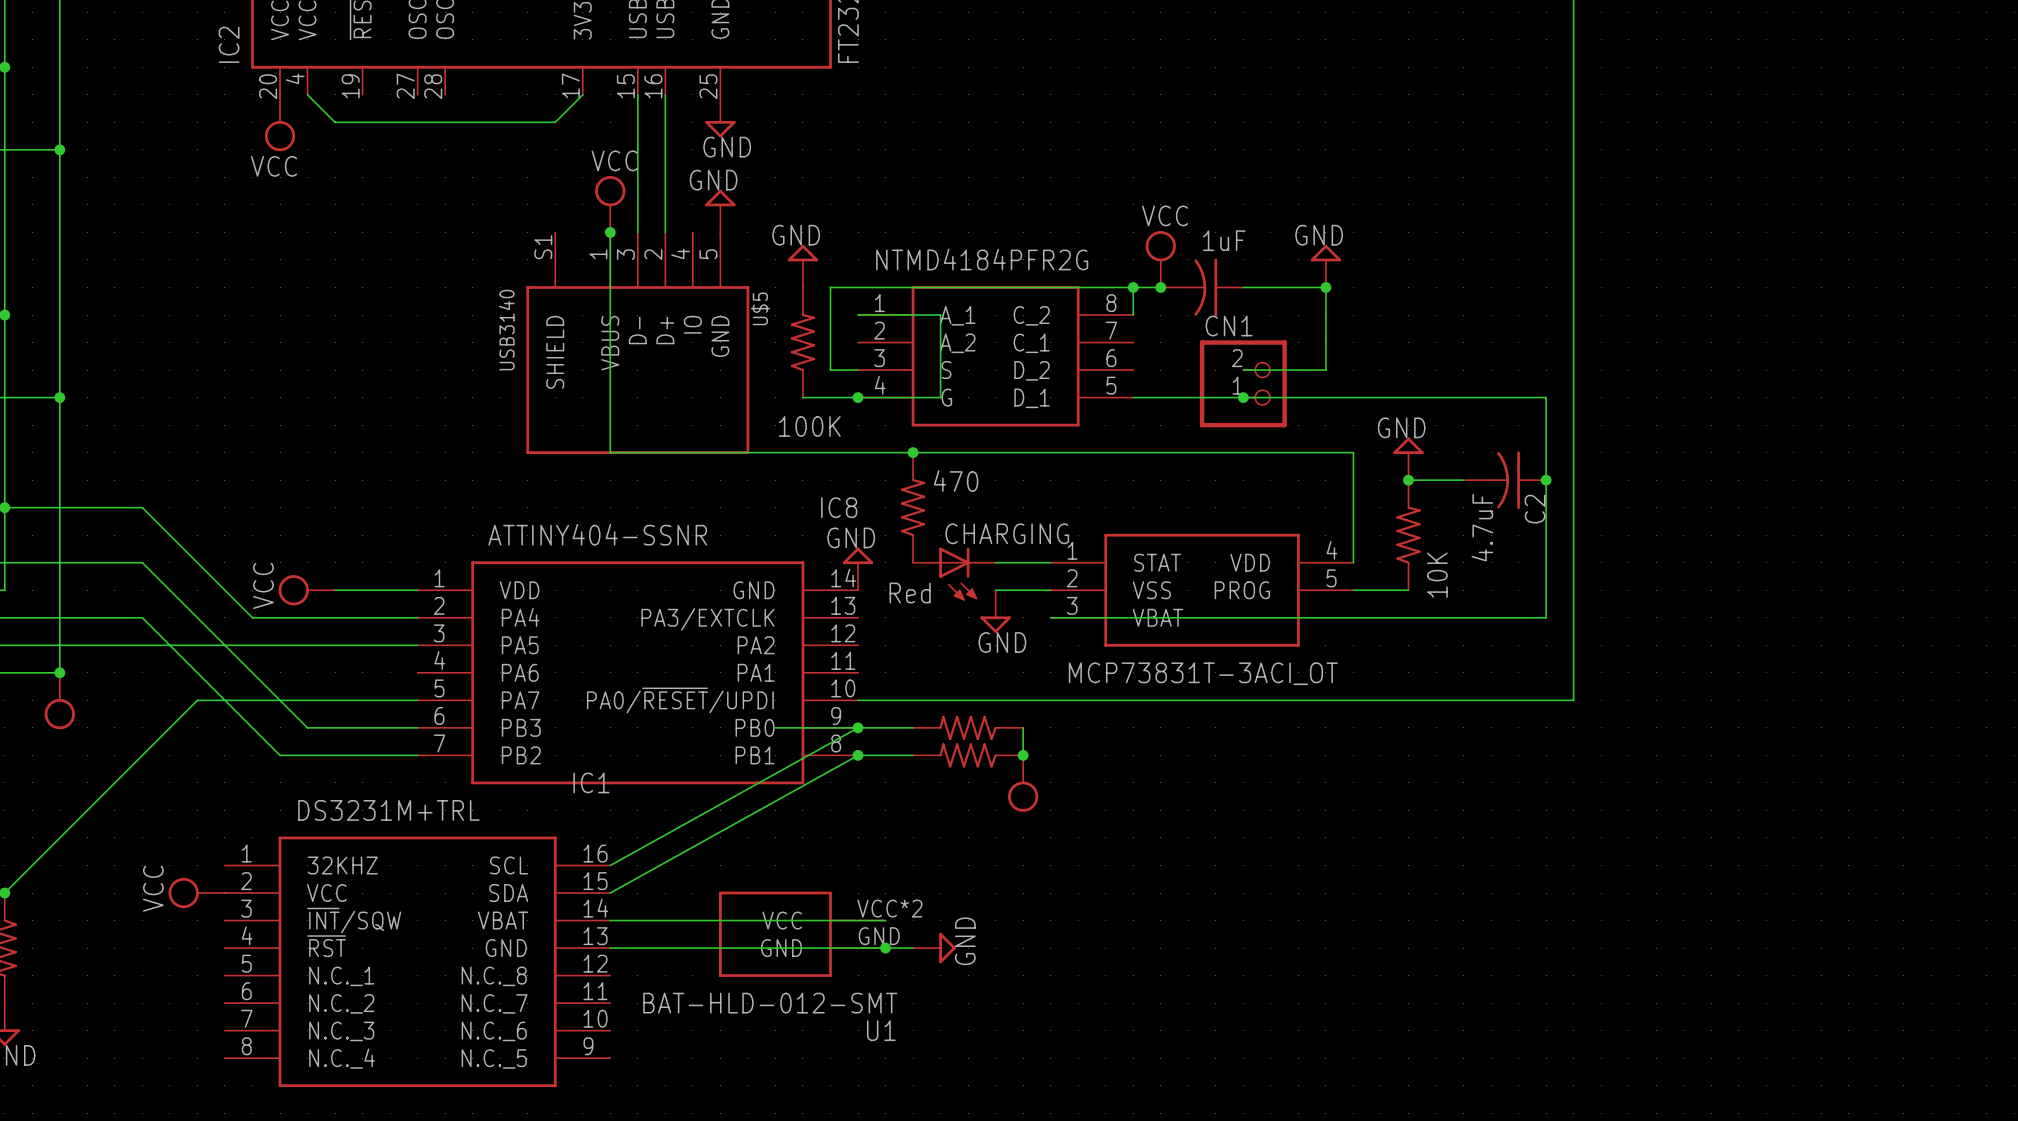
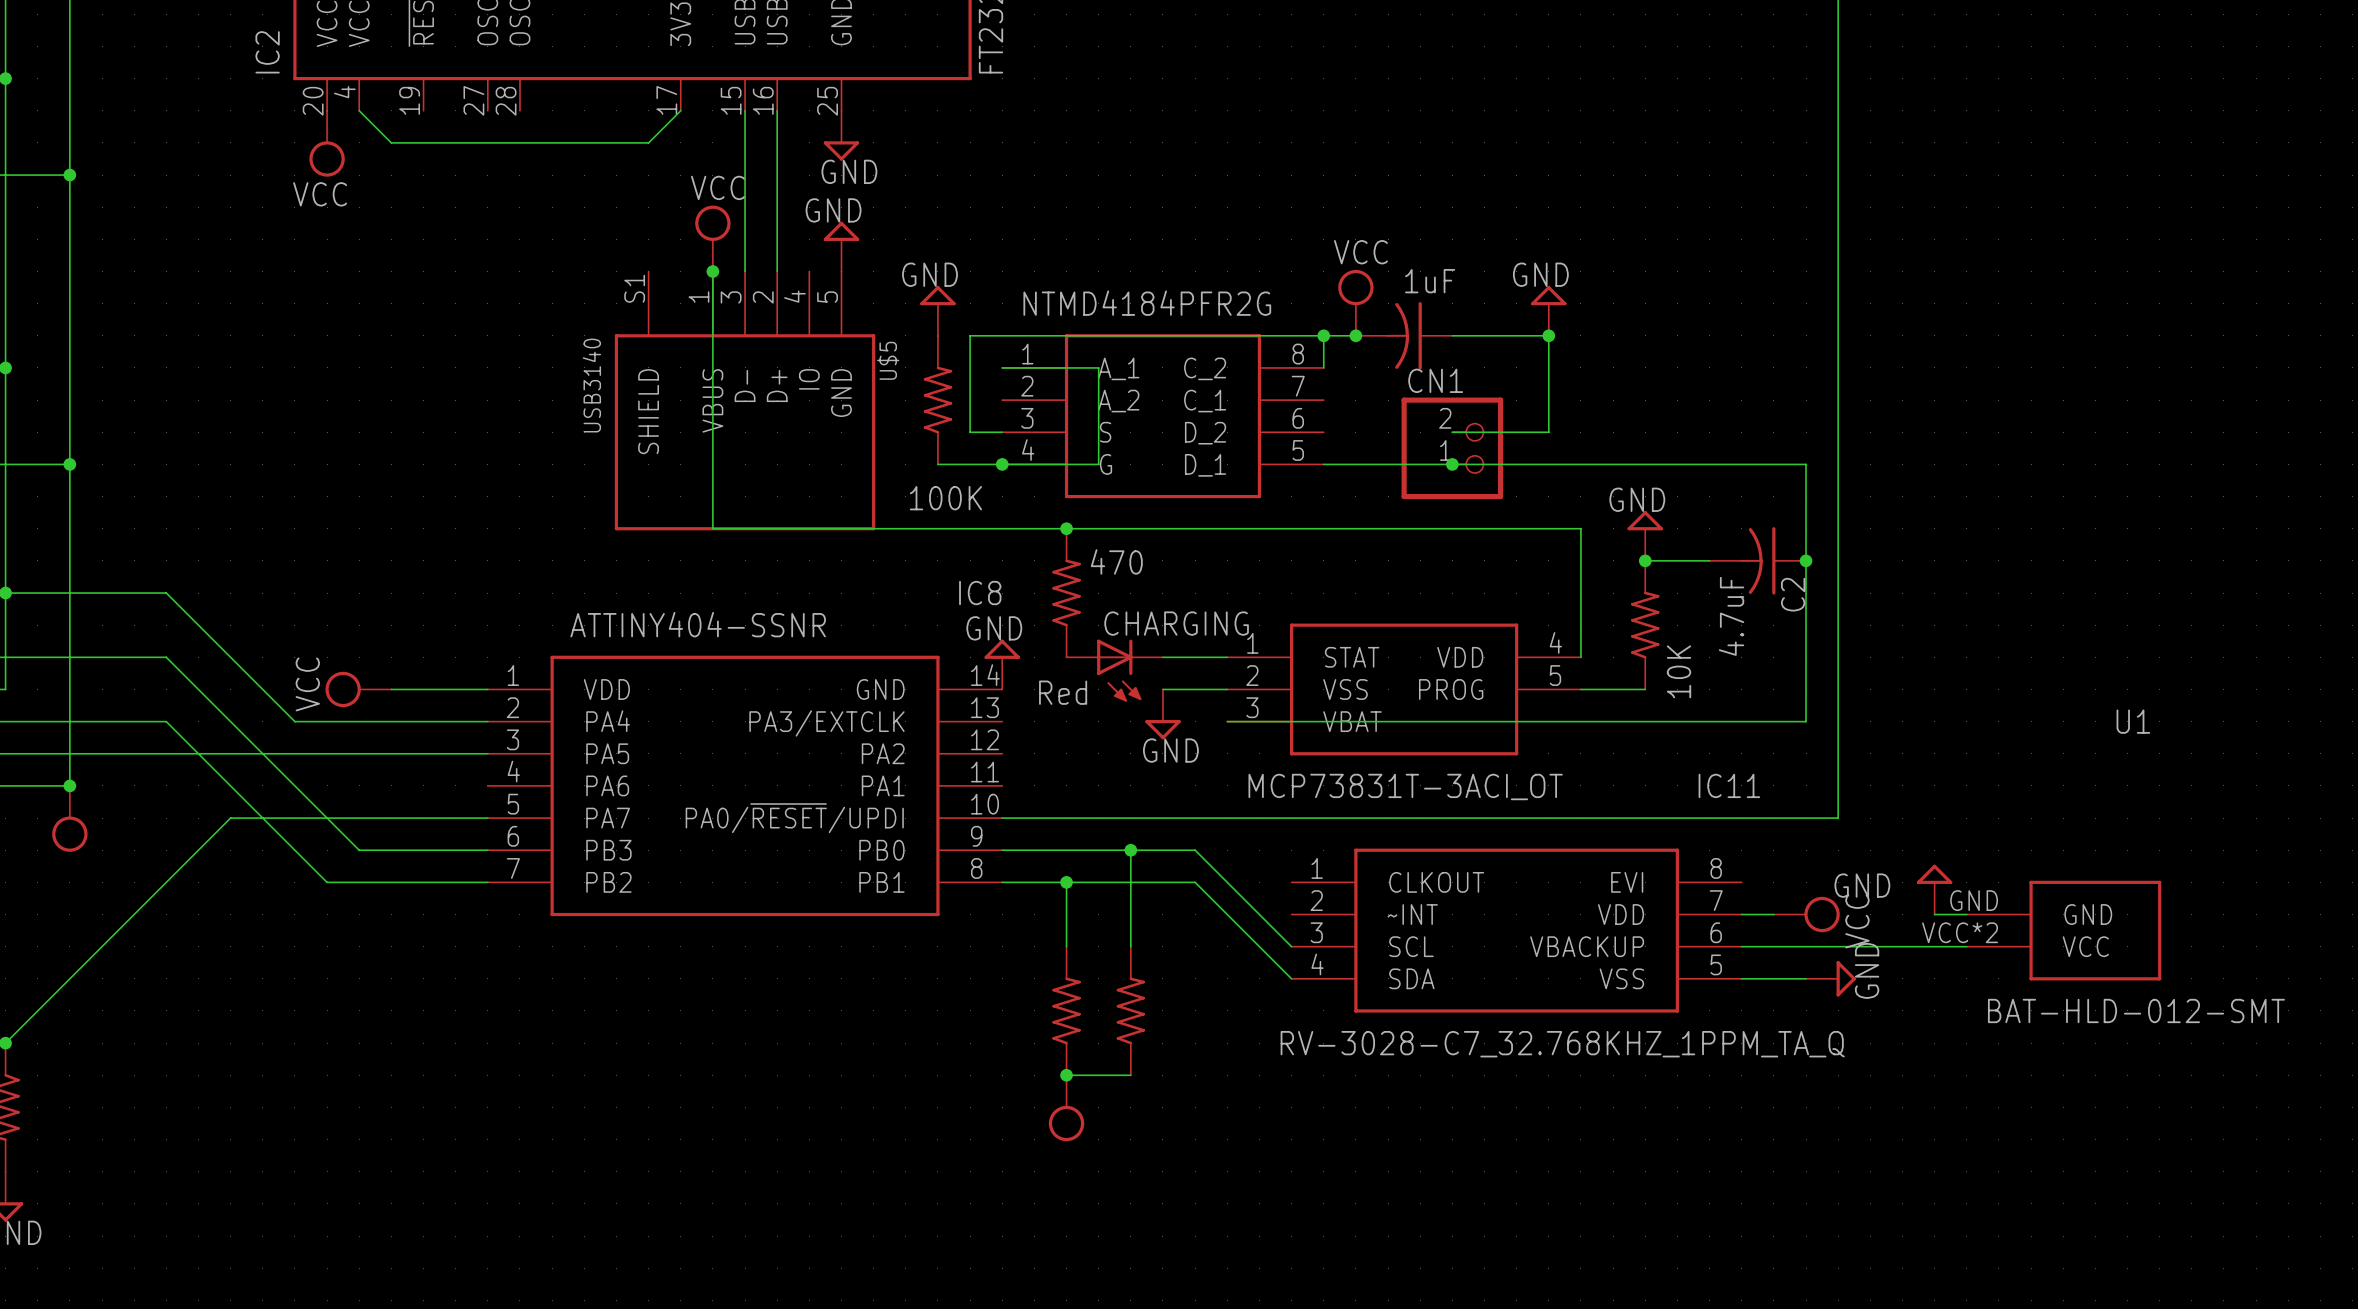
wire: (775, 727) (858, 727) (610, 865) -> none
junction: (858, 727) -> none
wire: none -> (1066, 850) (1195, 850) (1291, 946)
wire: none -> (1130, 850) (1130, 946)
part: (968, 727) -> none
junction: none -> (1130, 850)
wire: (1023, 727) (1023, 755) -> none
wire: (858, 755) (610, 893) -> none
junction: (858, 755) -> none
junction: none -> (1066, 882)
part: (968, 755) -> none
junction: (1023, 755) -> none
power symbol: none -> GND (1934, 889)
wire: none -> (1741, 914) (1773, 914)
power symbol: none -> VCC (1806, 914)
wire: none -> (1934, 914) (1966, 914)
power symbol position: (1023, 783) -> (1066, 1108)
IC11: none -> RV-3028-C7_32.768KHZ_1PPM_TA_Q (1516, 930)
wire: none -> (1066, 946) (1066, 882) (1195, 882) (1291, 978)
wire: none -> (1741, 946) (1966, 946)
wire: none -> (1741, 978) (1806, 978)
power symbol: none -> GND (1830, 978)
part: none -> (1066, 1010)
part: none -> (1130, 1010)
power symbol: VCC (196, 893) -> none
wire: (610, 920) (885, 920) -> none
wire: none -> (1066, 1075) (1130, 1075)
U1 rotation: 0° (775, 934) -> 180° (2095, 930)
U1 position: (802, 934) -> (2064, 930)
wire: (610, 948) (913, 948) -> none
junction position: (885, 948) -> (1066, 1075)
power symbol: GND (934, 948) -> none
IC1: DS3231M+TRL (417, 961) -> none
U1 value position: BAT-HLD-012-SMT (770, 1003) -> BAT-HLD-012-SMT (2136, 1010)
U1 name position: U1 (881, 1030) -> U1 (2133, 721)

